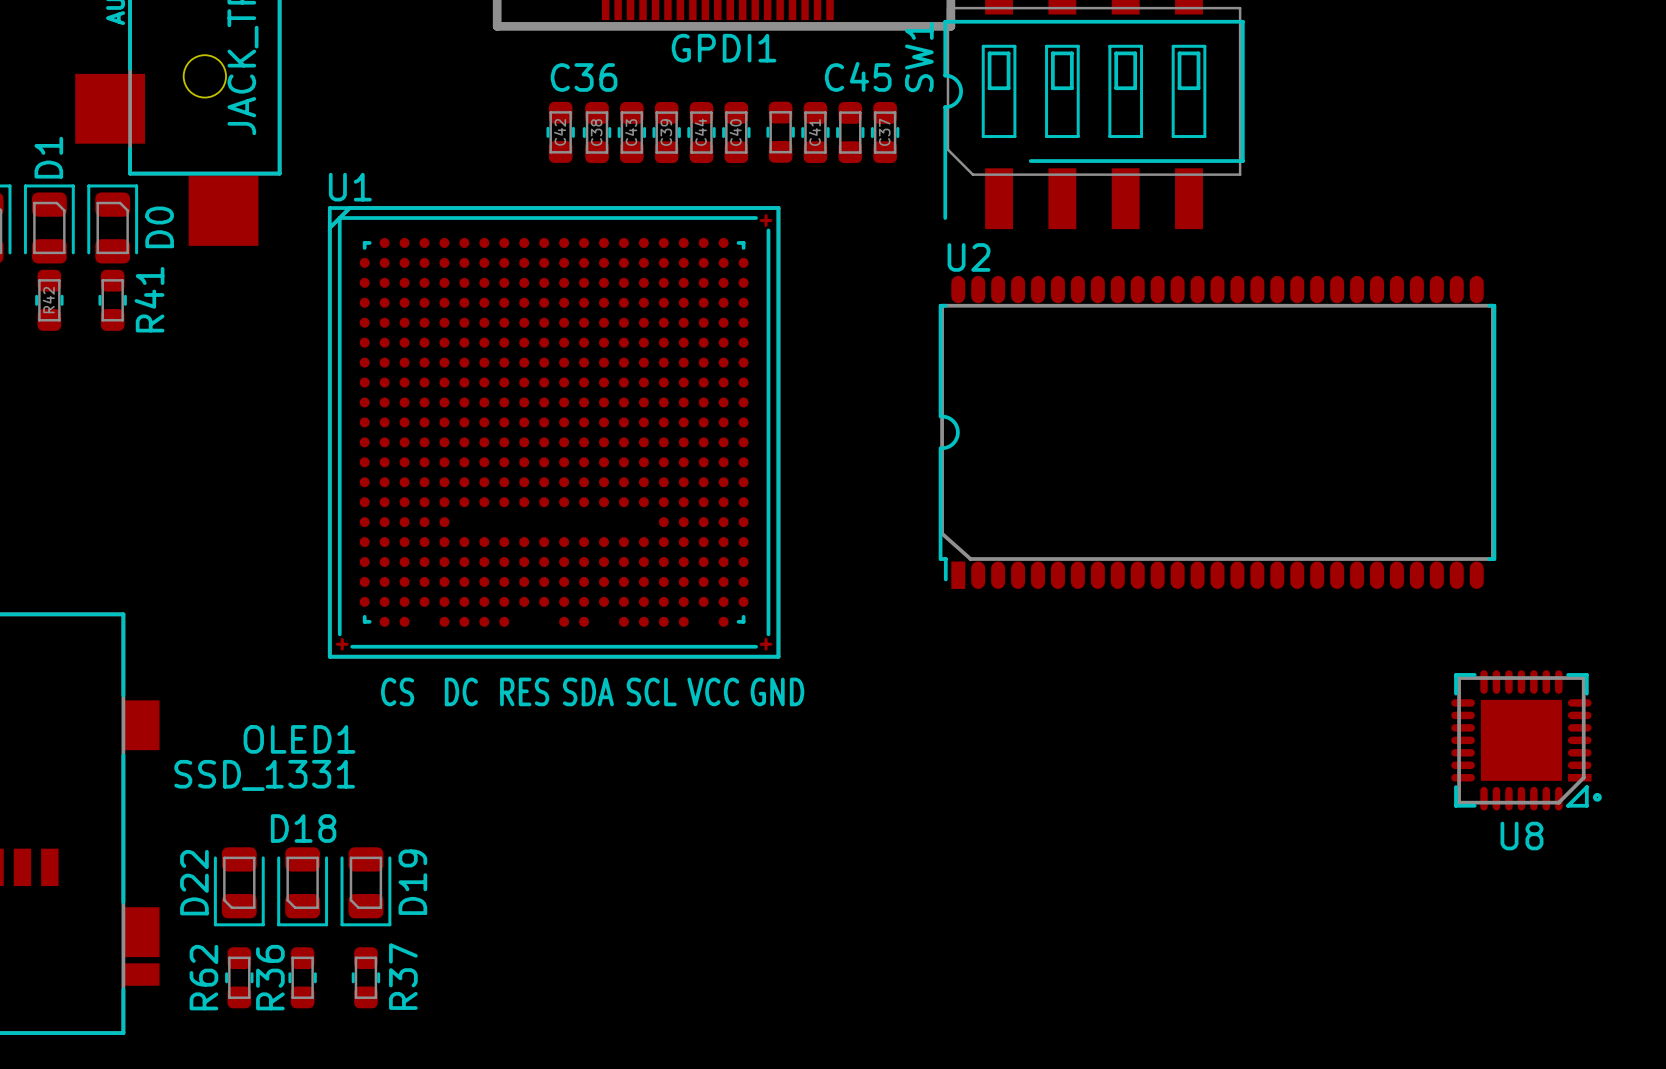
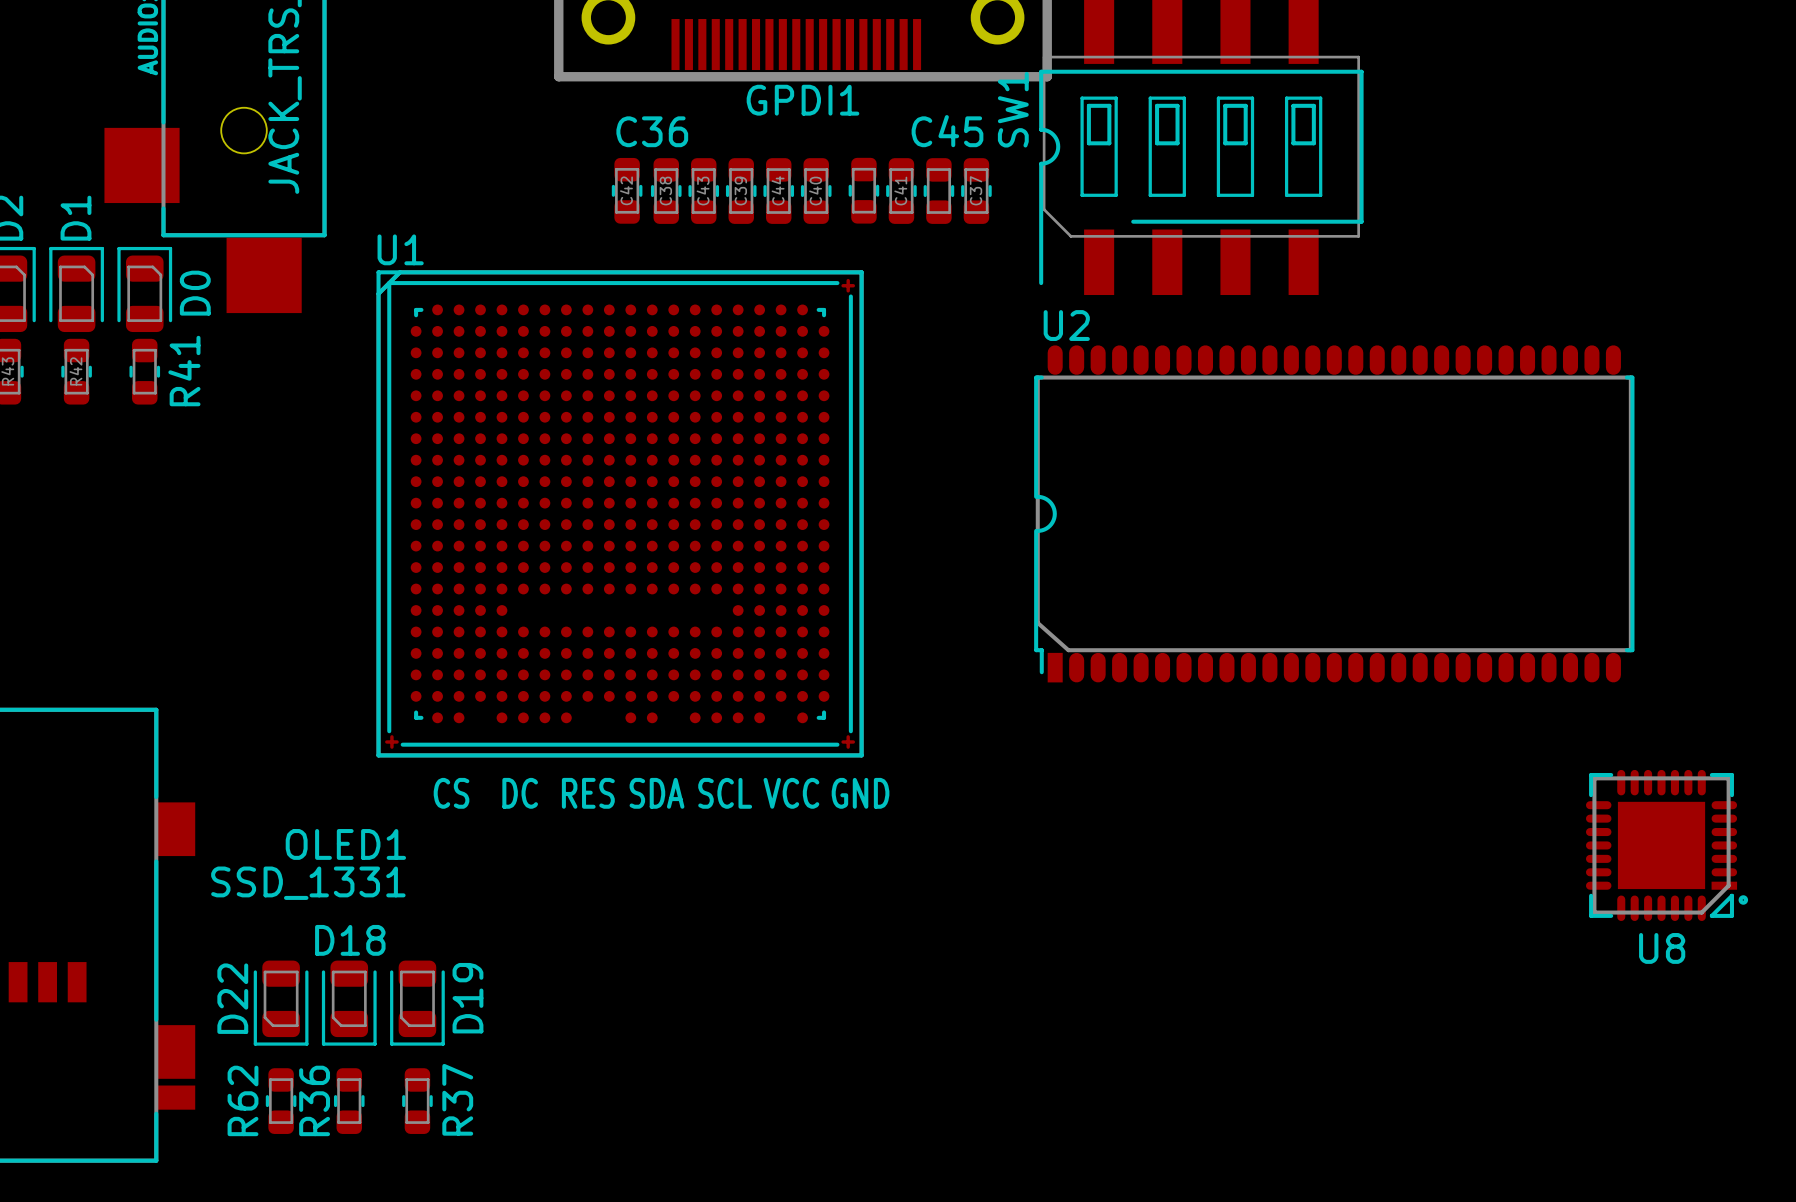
U8 footprint: [1451, 670, 1602, 811] -> [1585, 769, 1749, 922]

